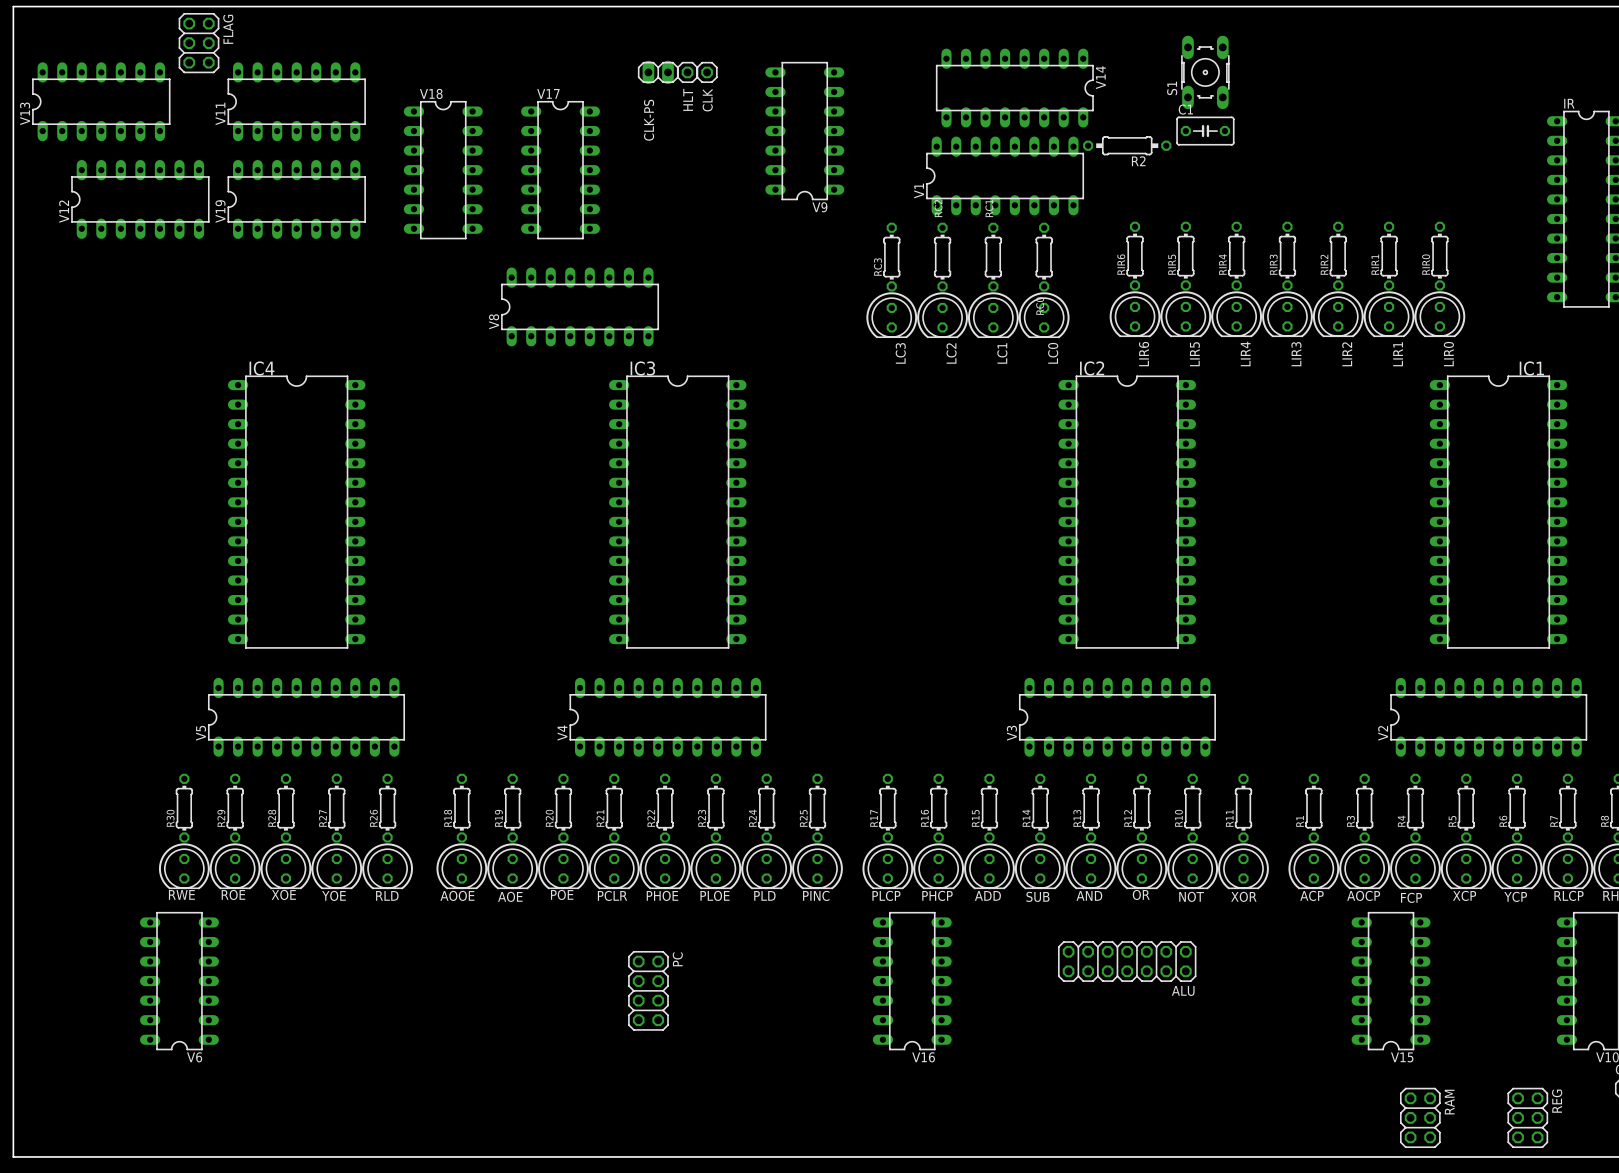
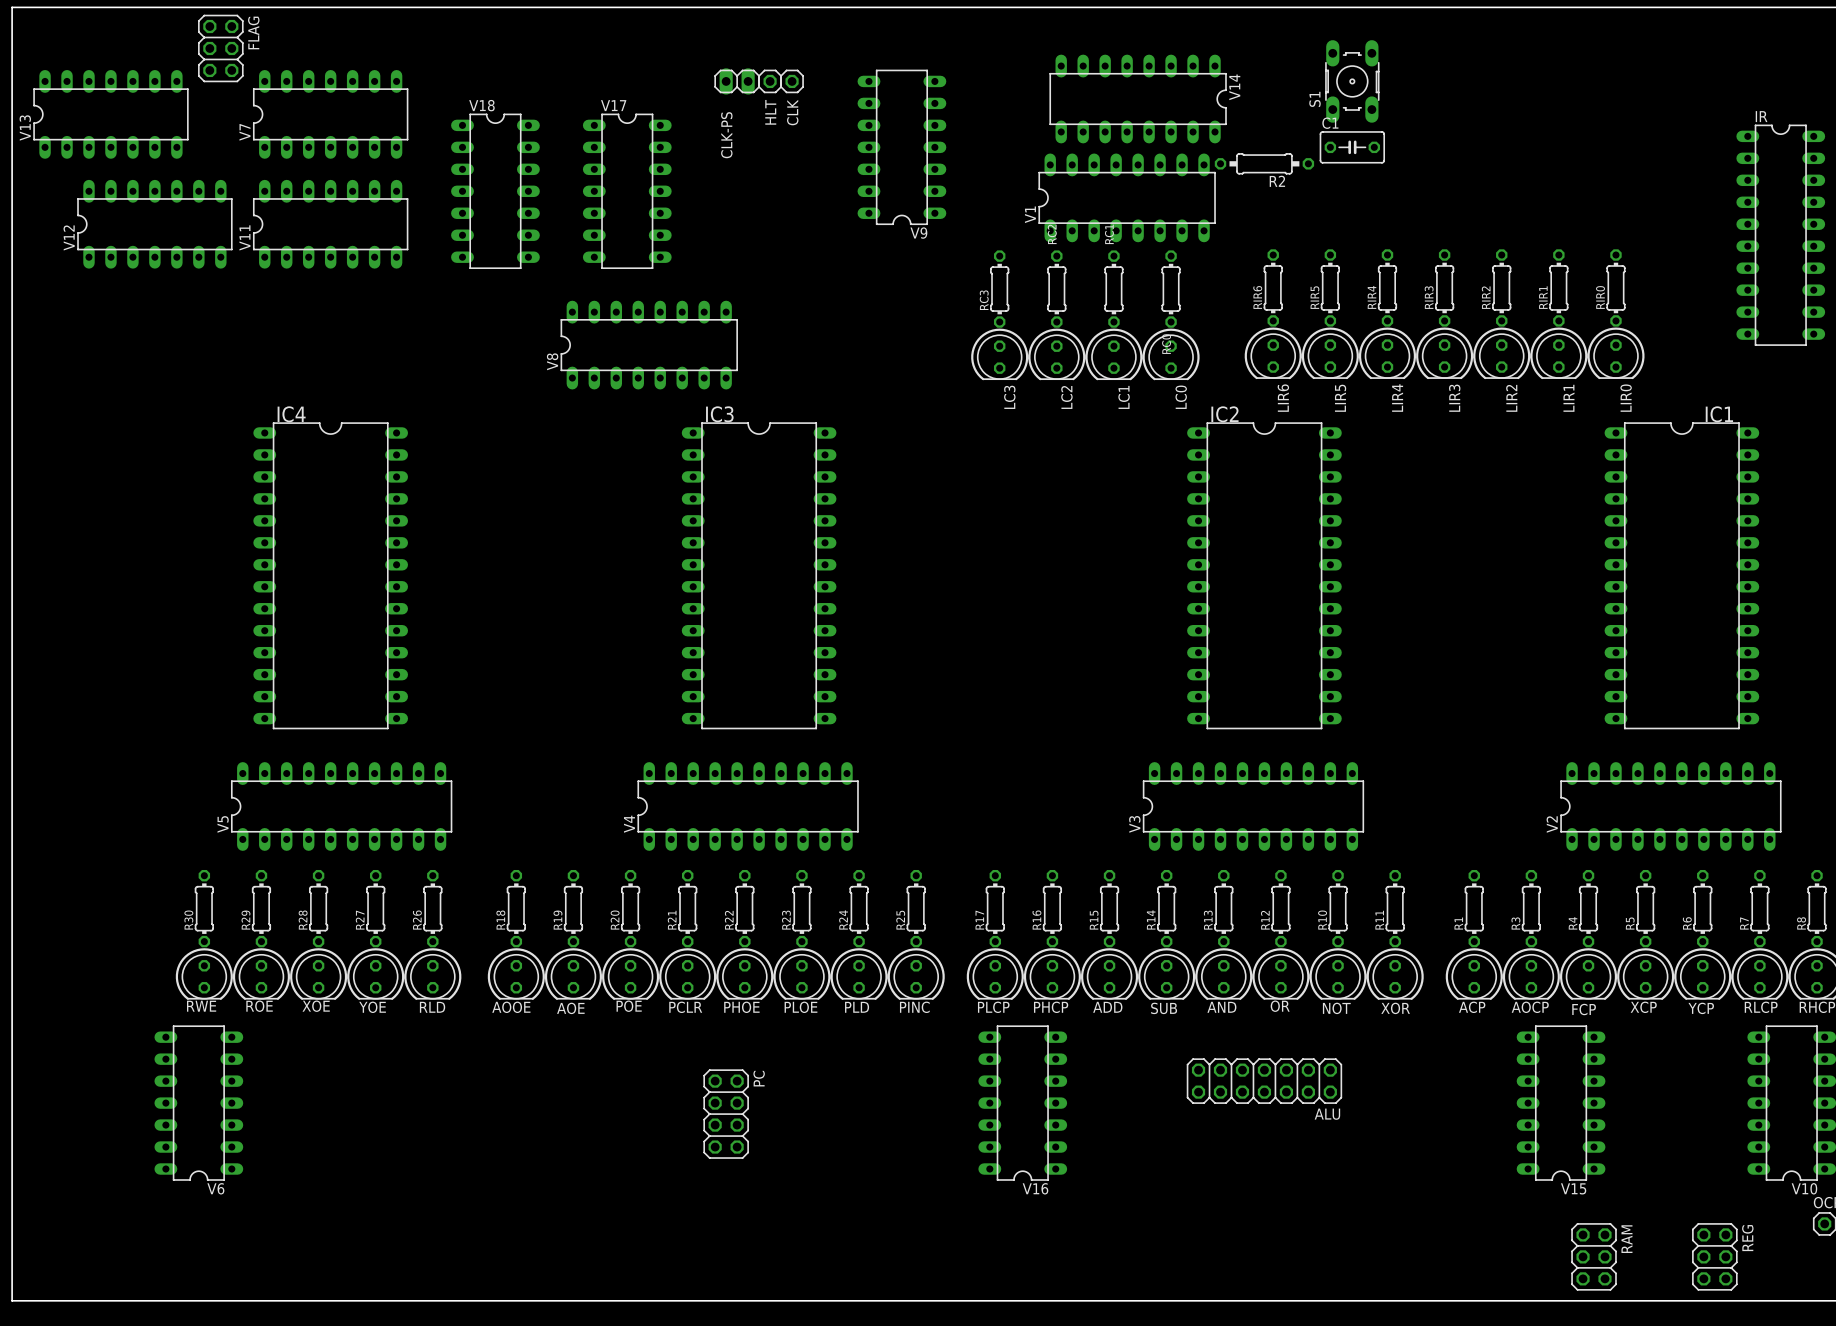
V11 name: V11 (220, 113) -> V7 (244, 132)
V19 name: V19 (220, 211) -> V11 (244, 237)

